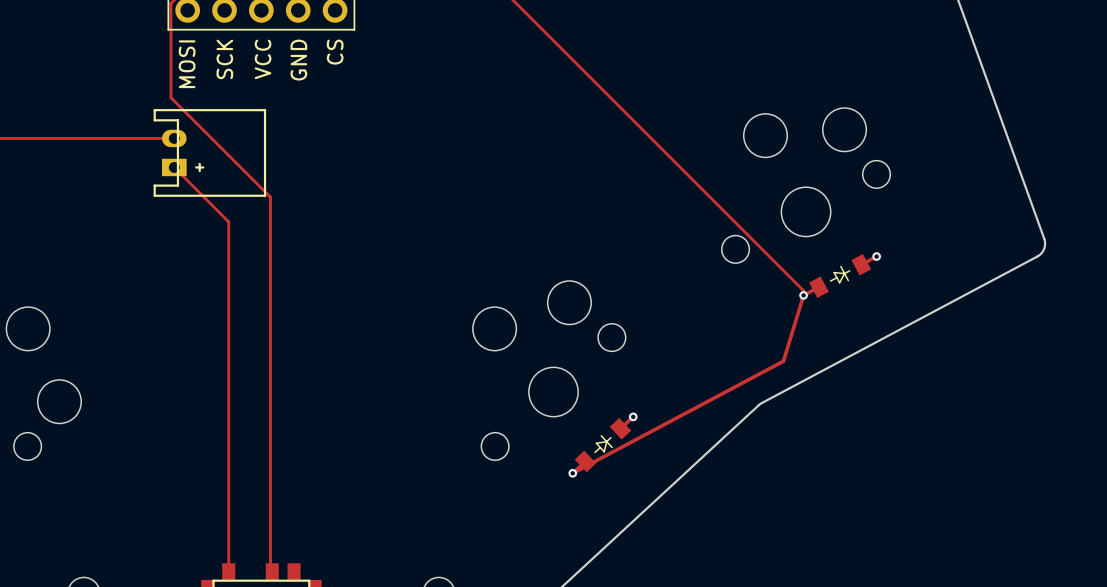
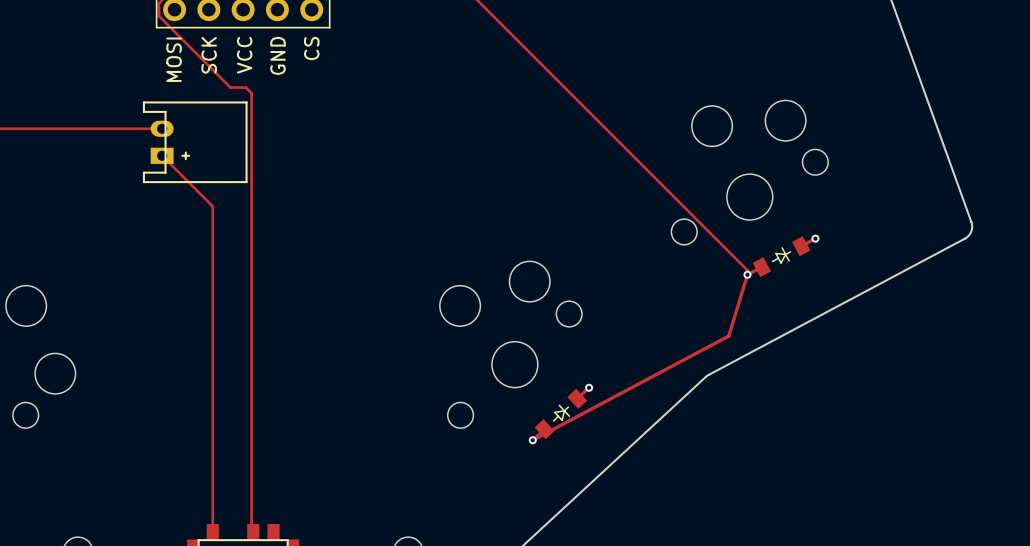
track: (170, 17) (170, 97) (270, 197) -> (159, 16) (230, 87) (245, 87) (251, 93) (251, 183)

